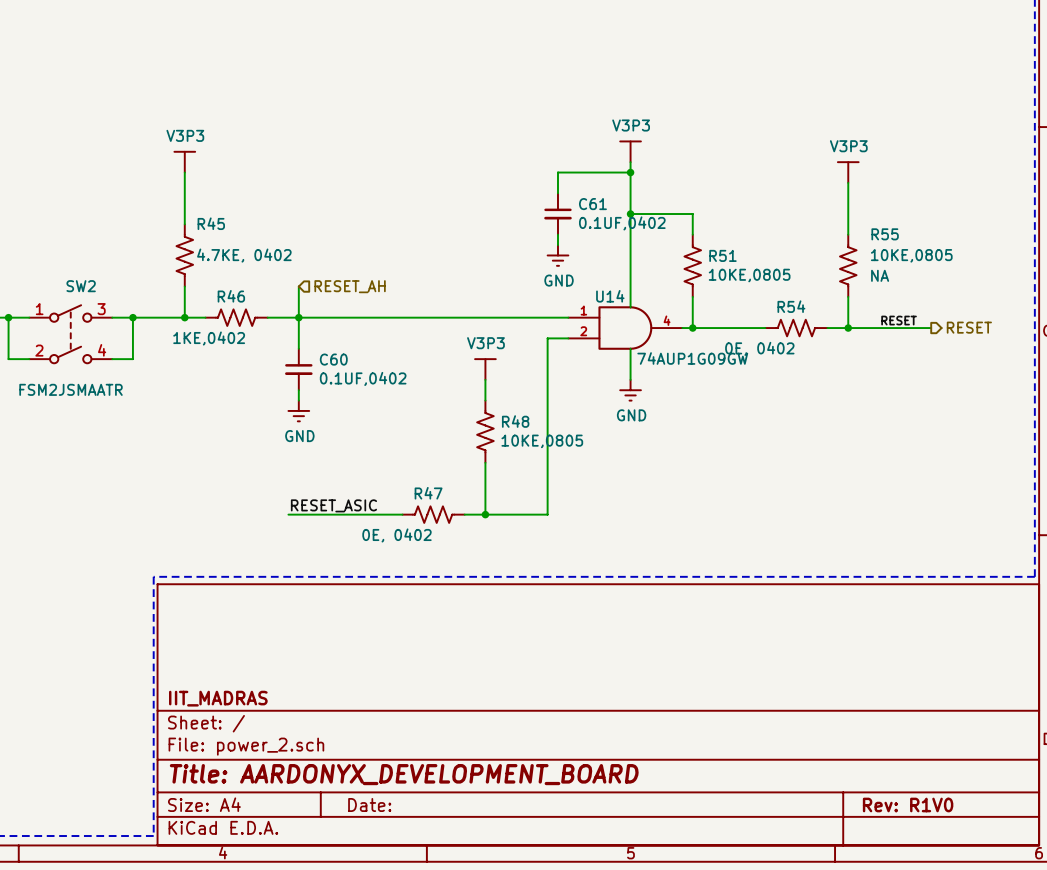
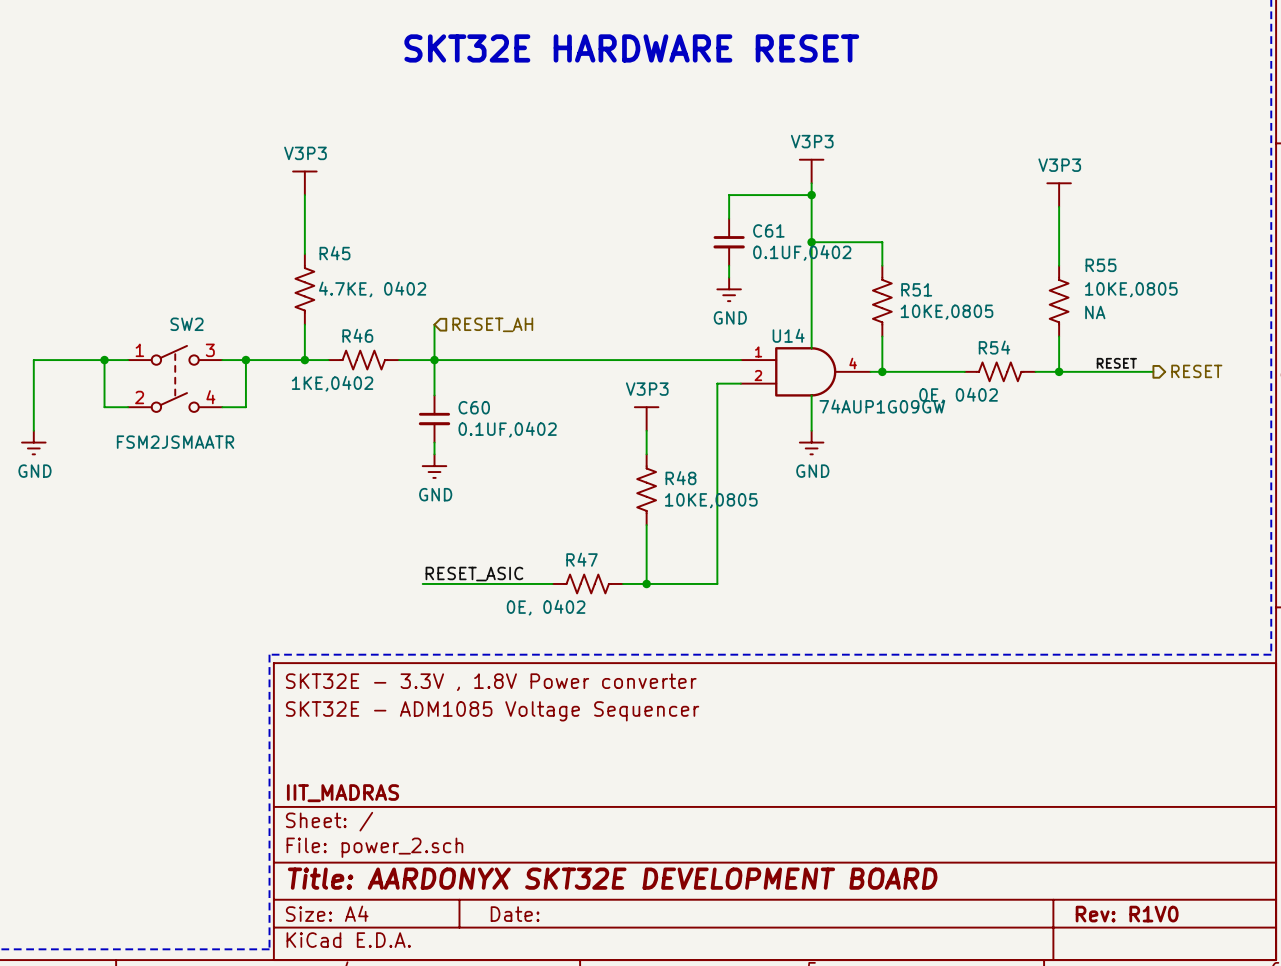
text: none -> SKT32E HARDWARE RESET (631, 48)
title block: none -> SKT32E - 3.3V , 1.8V Power converter (491, 682)
title block: none -> SKT32E - ADM1085 Voltage Sequencer (492, 711)
title block: Title: AARDONYX_DEVELOPMENT_BOARD (404, 774) -> Title: AARDONYX SKT32E DEVELOPMENT BOARD (612, 878)

